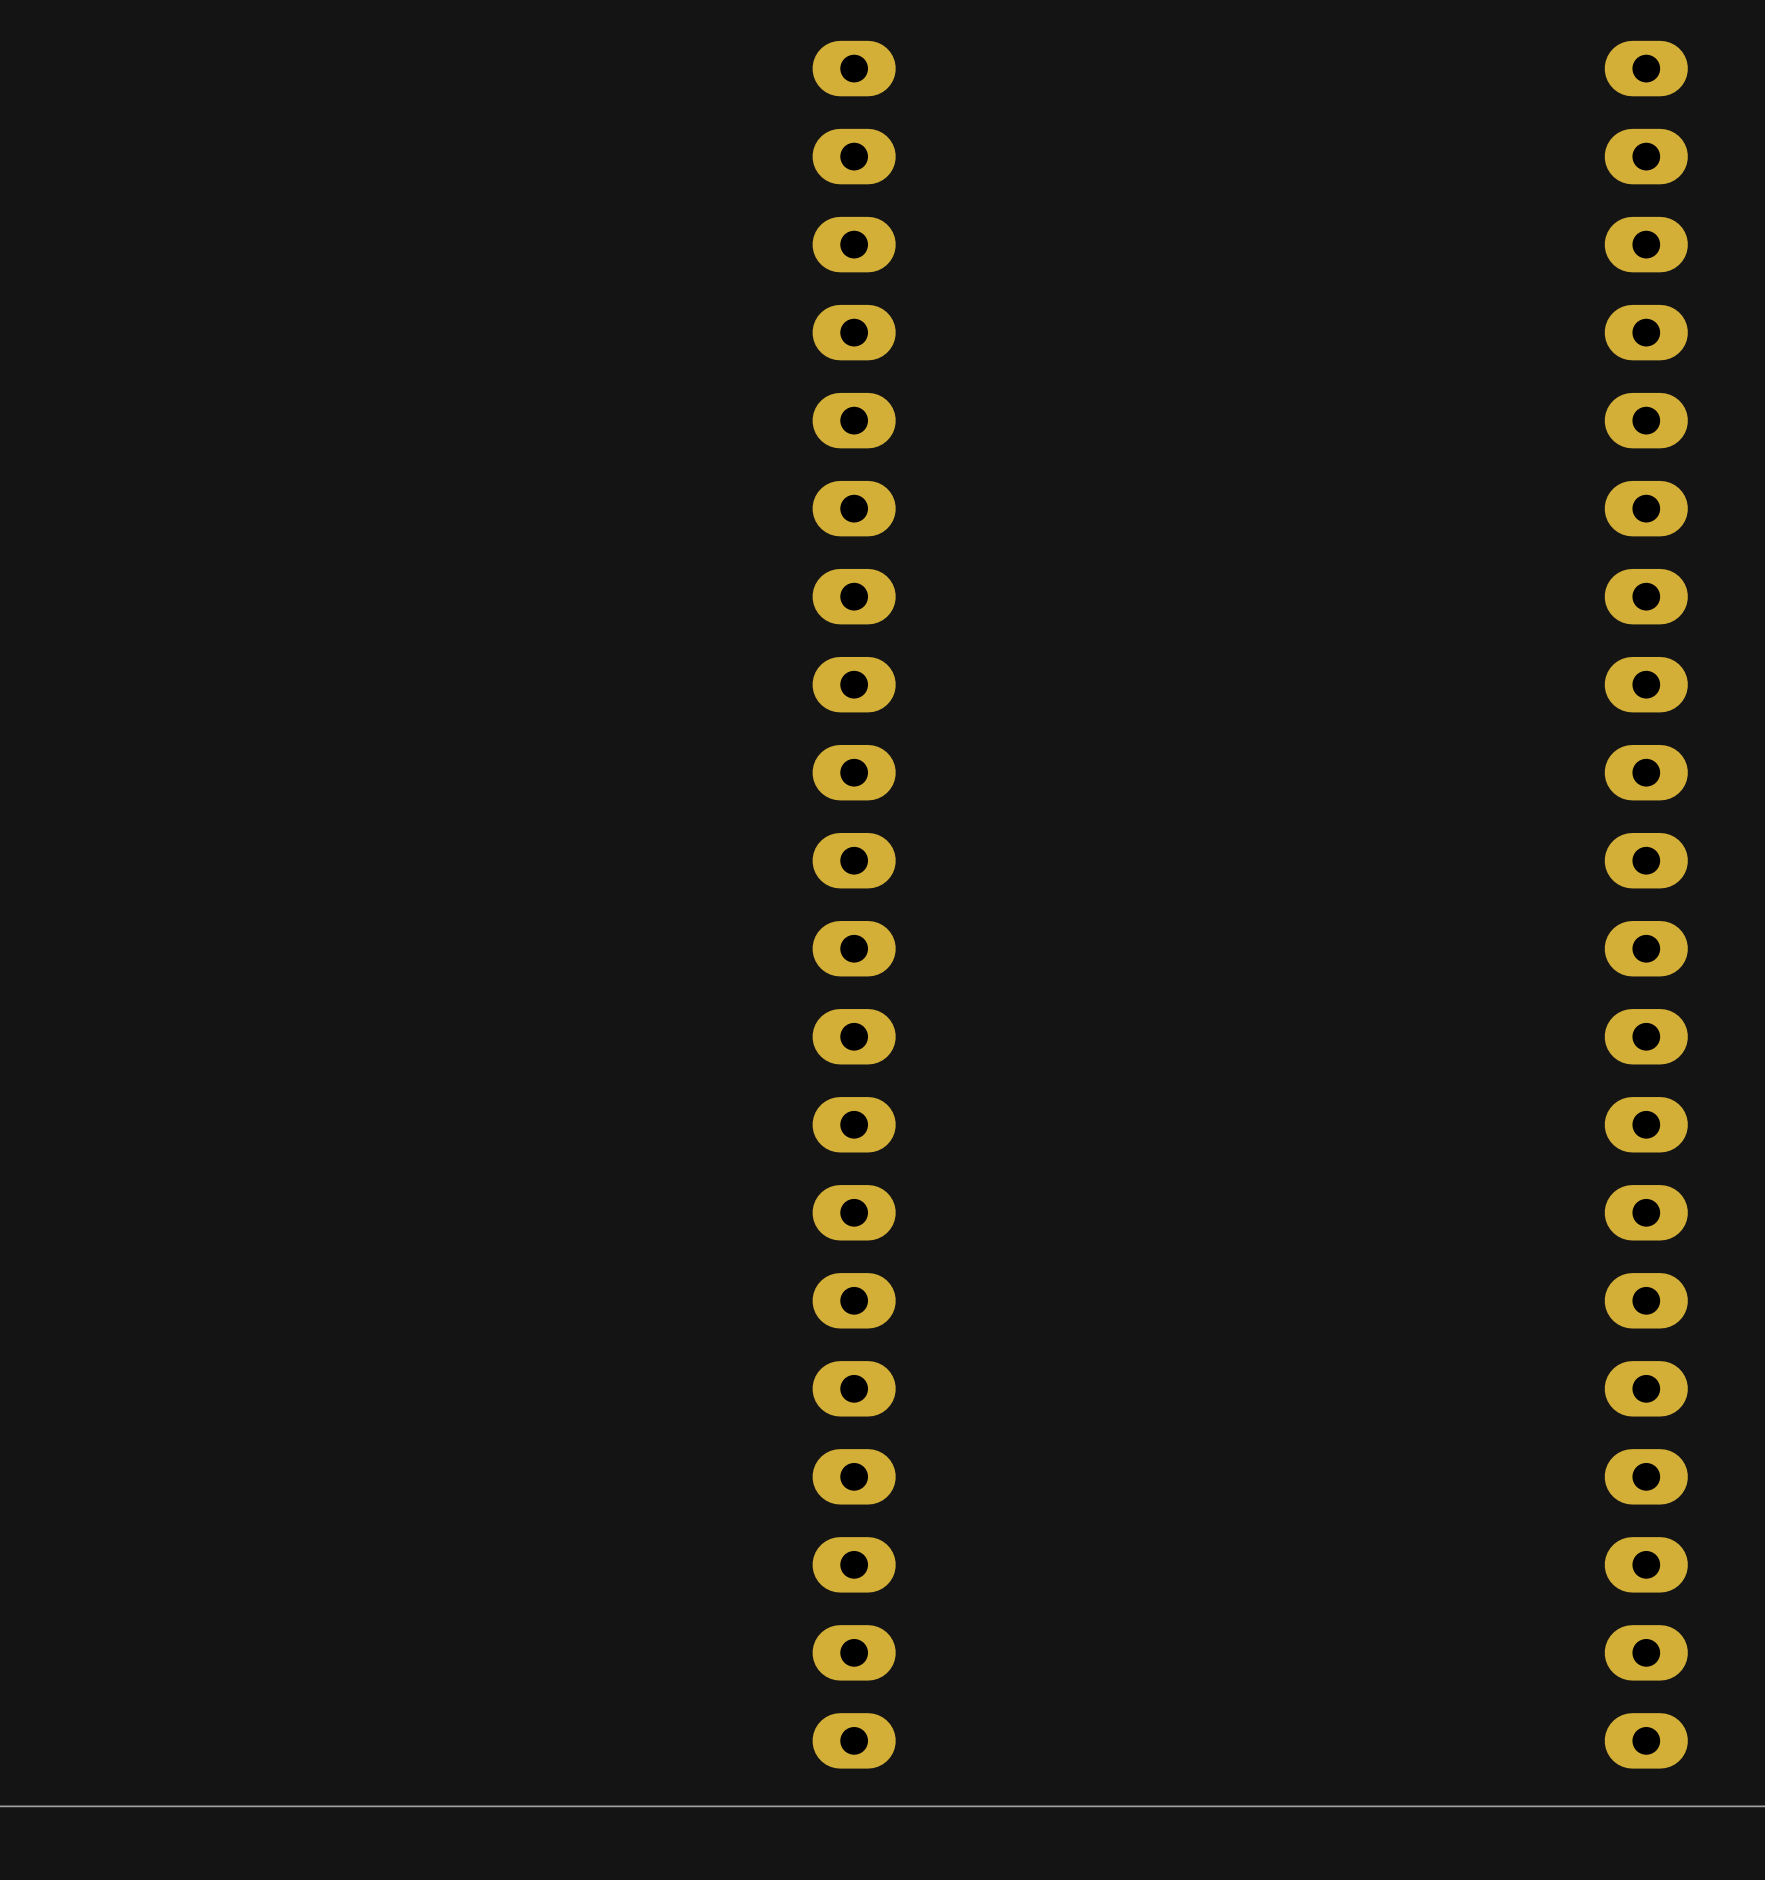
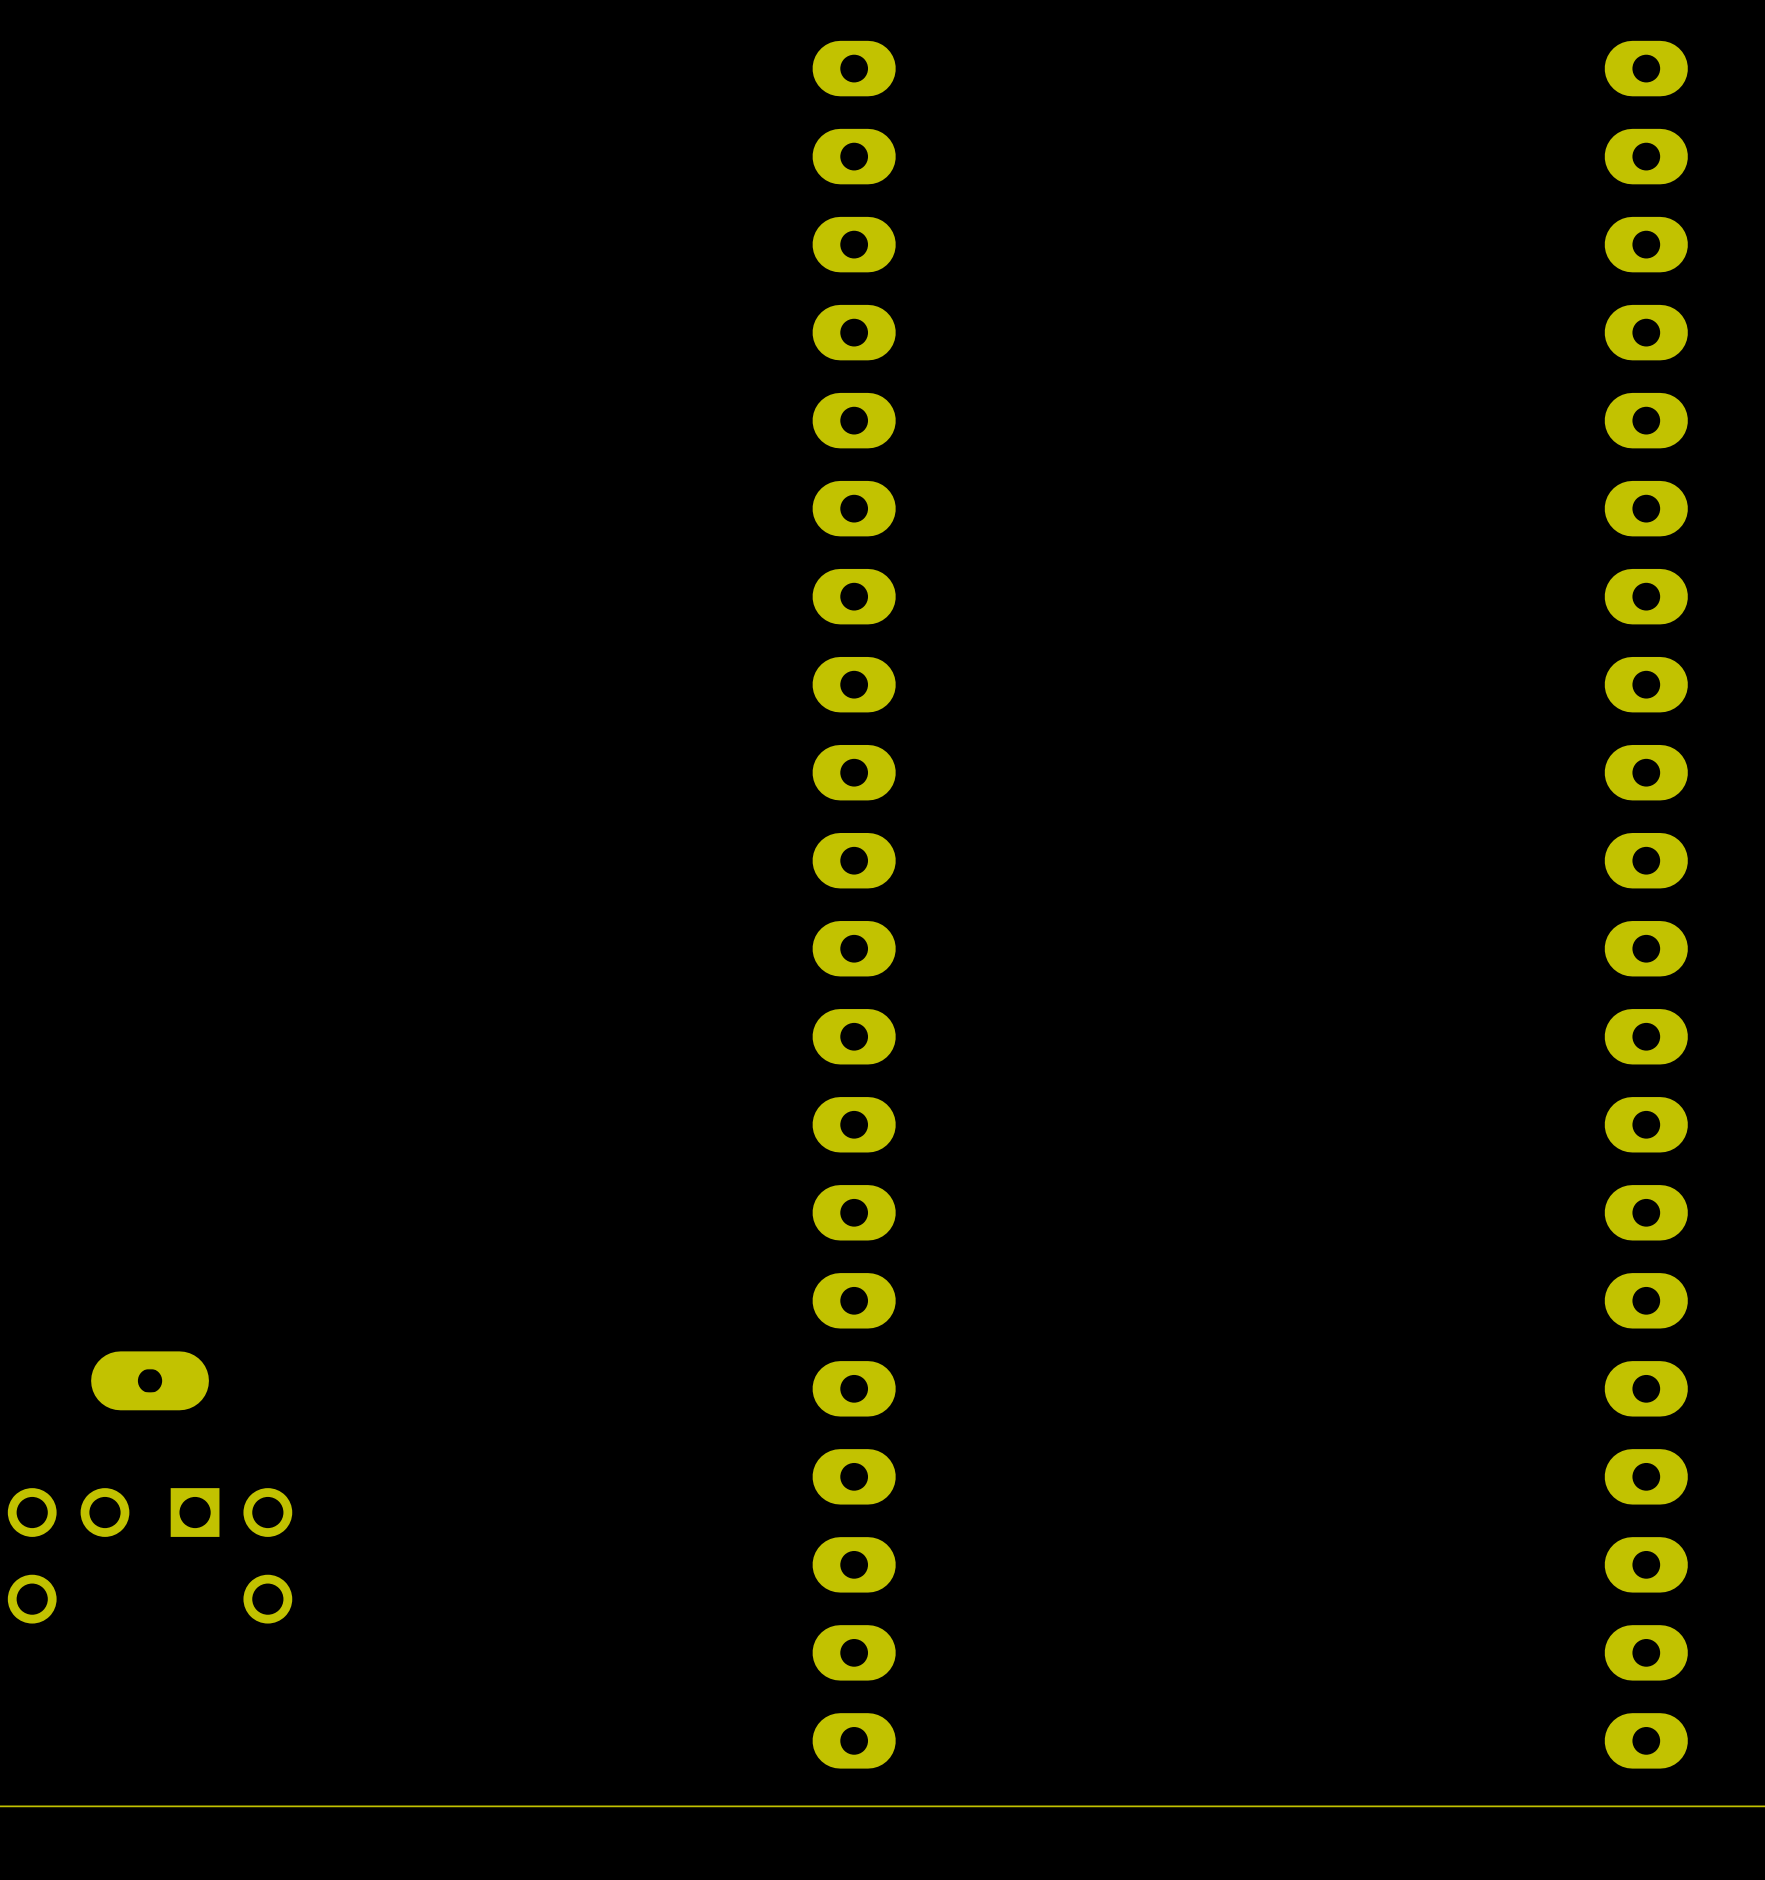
part: none -> (150, 1487)

